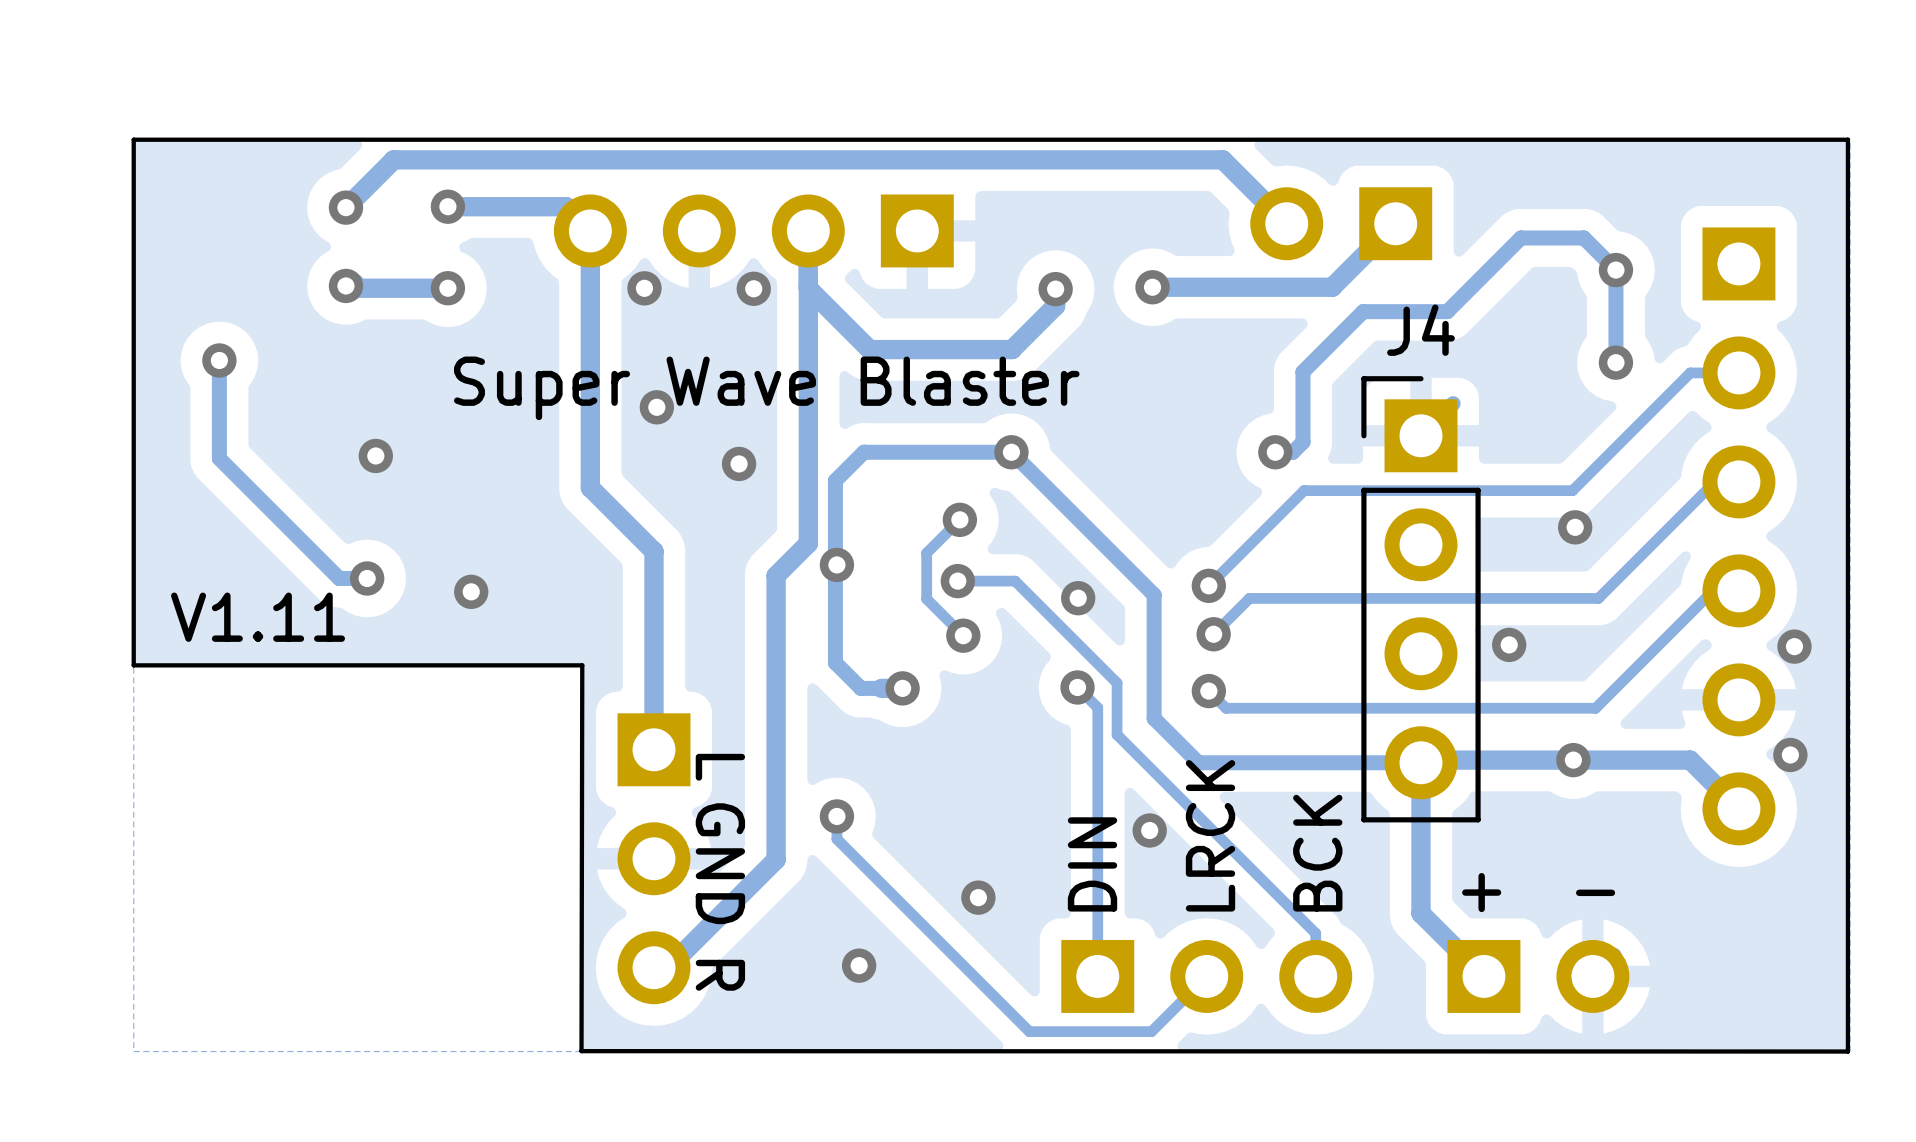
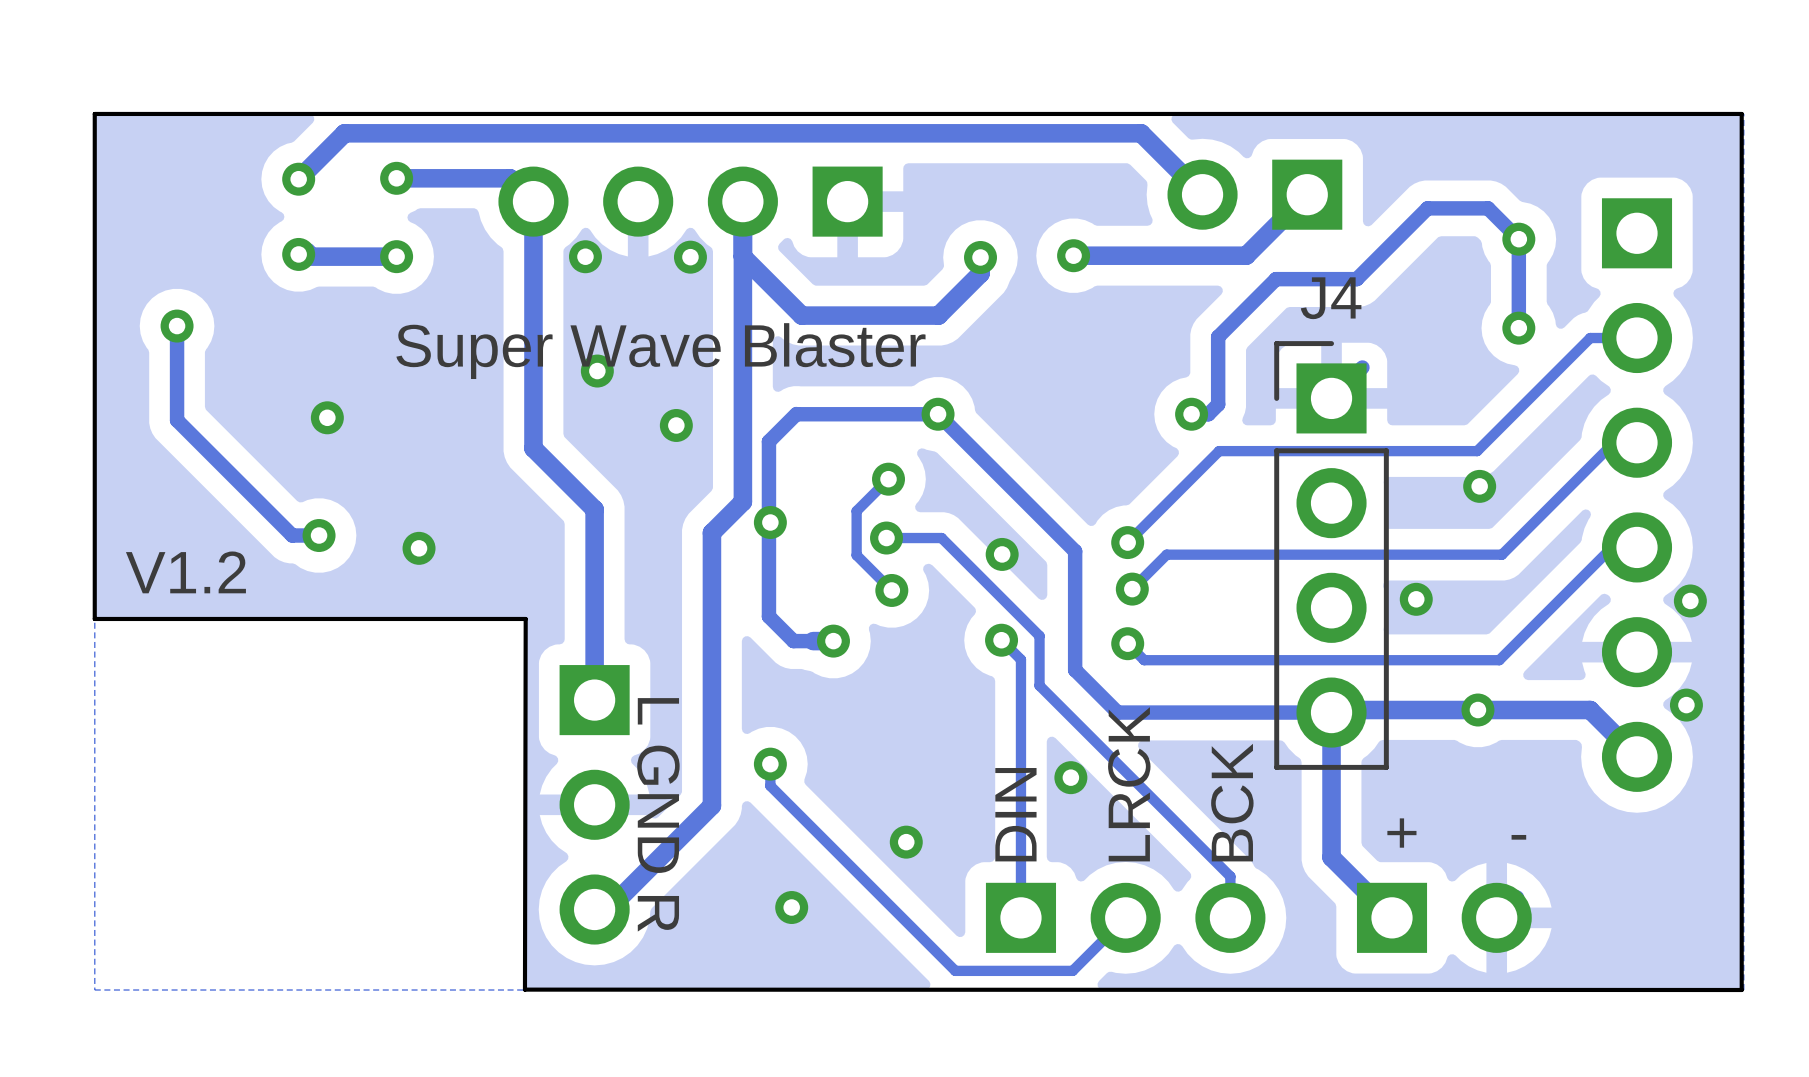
text: V1.11 (258, 617) -> V1.2 (185, 572)

